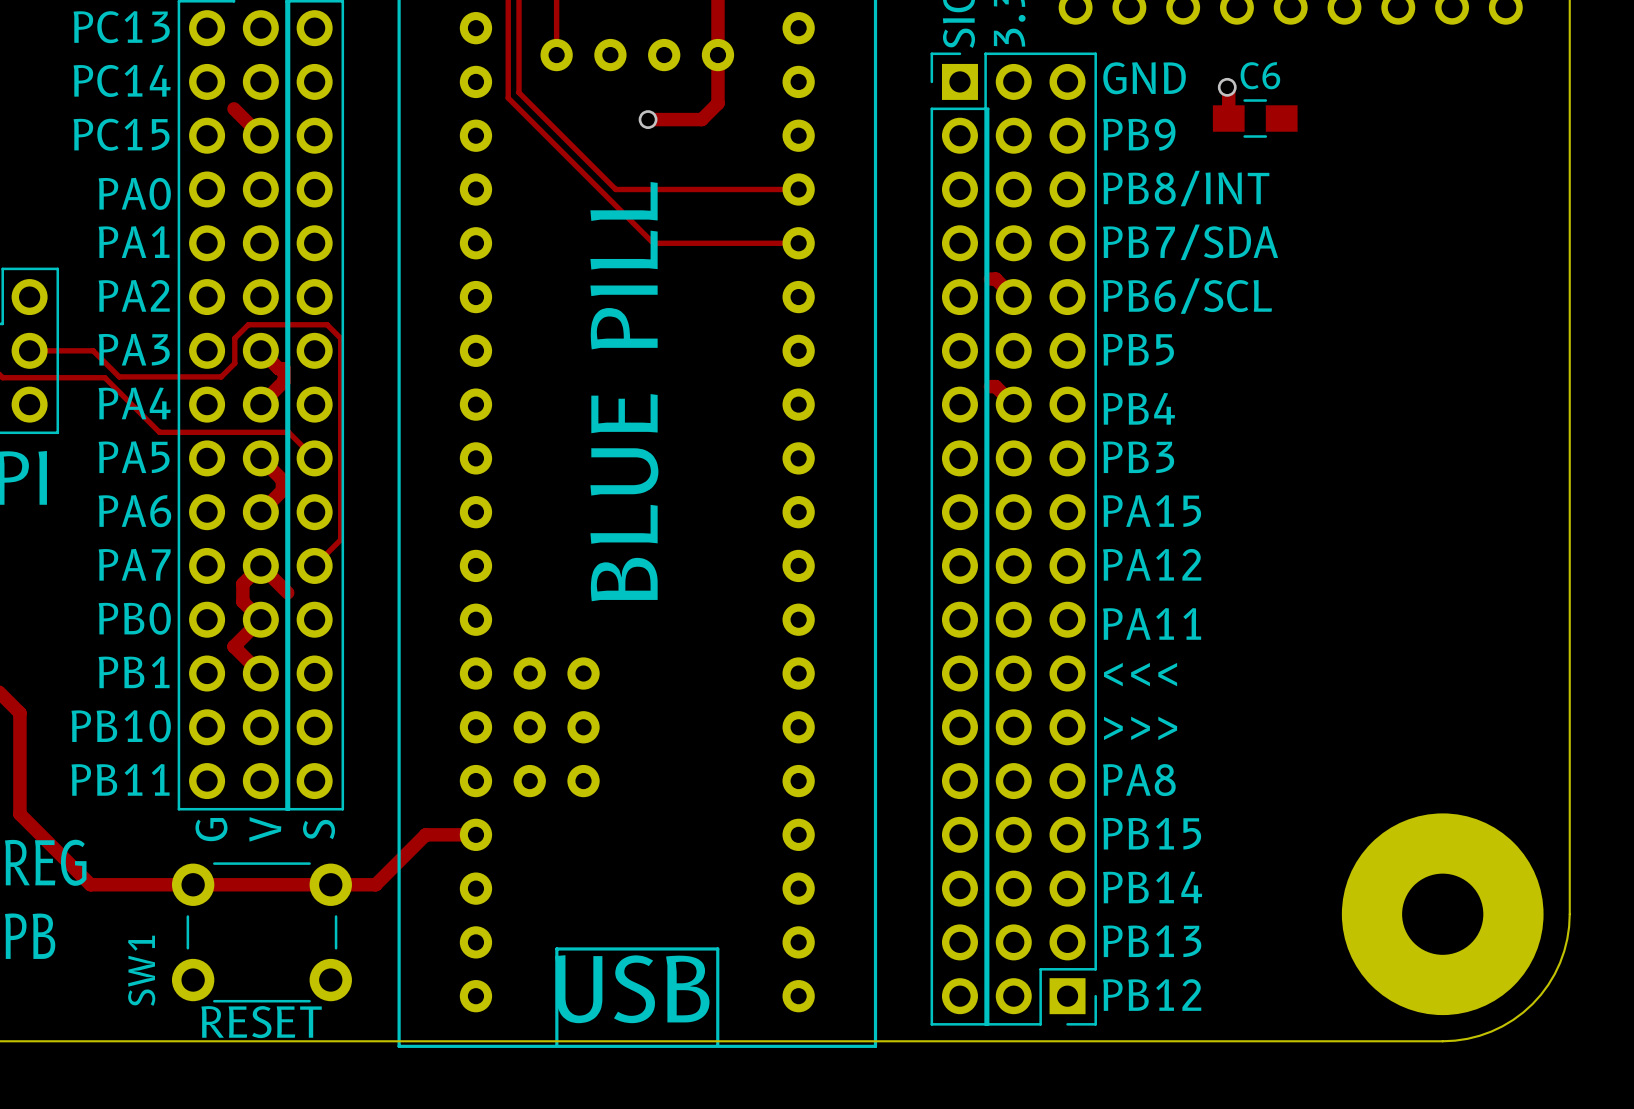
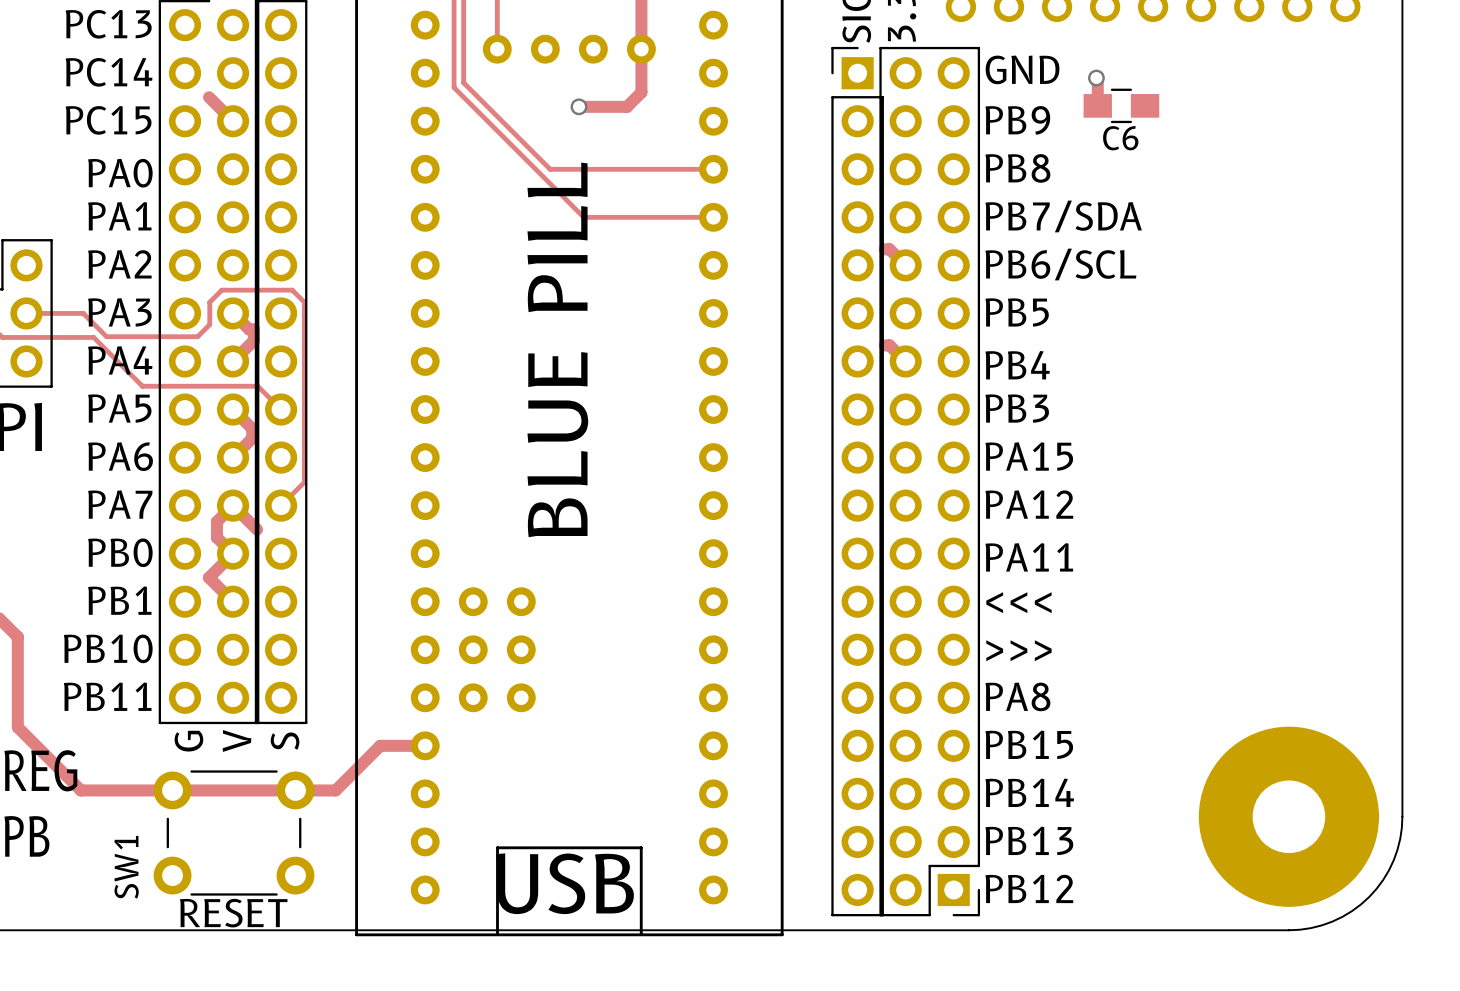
C6 name position: C6 (1260, 75) -> C6 (1120, 138)
text: PB8/INT (1186, 188) -> PB8 (1017, 168)

